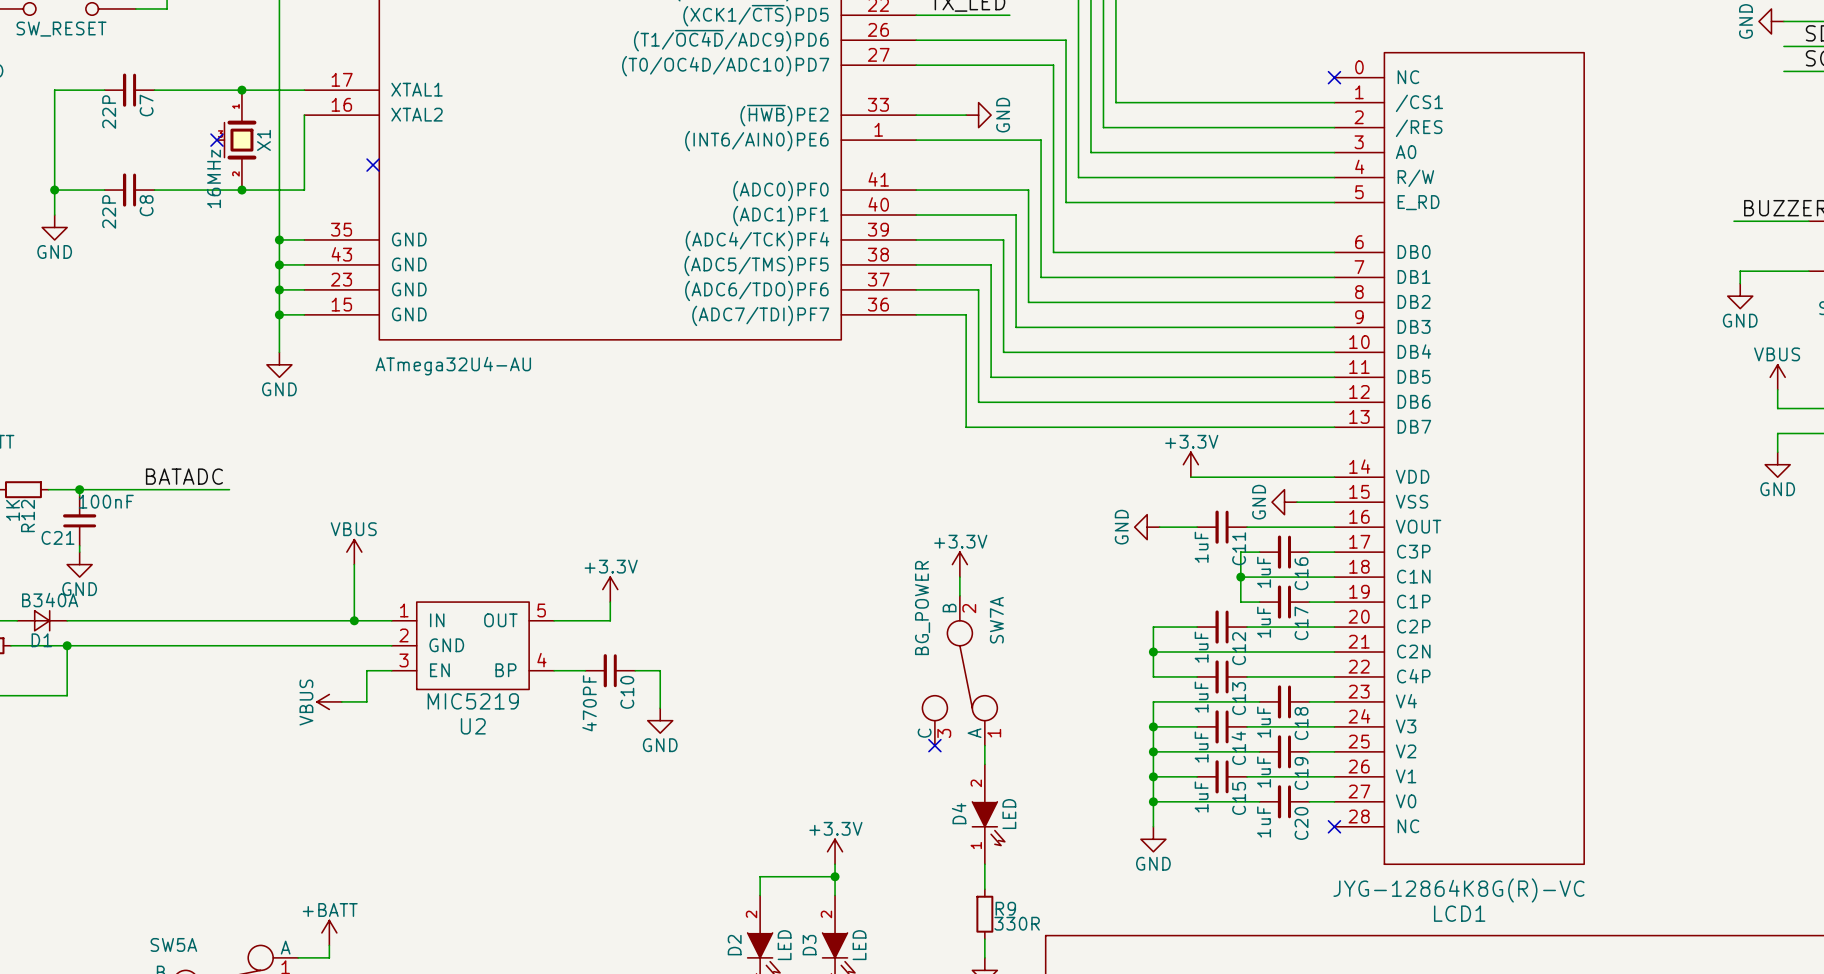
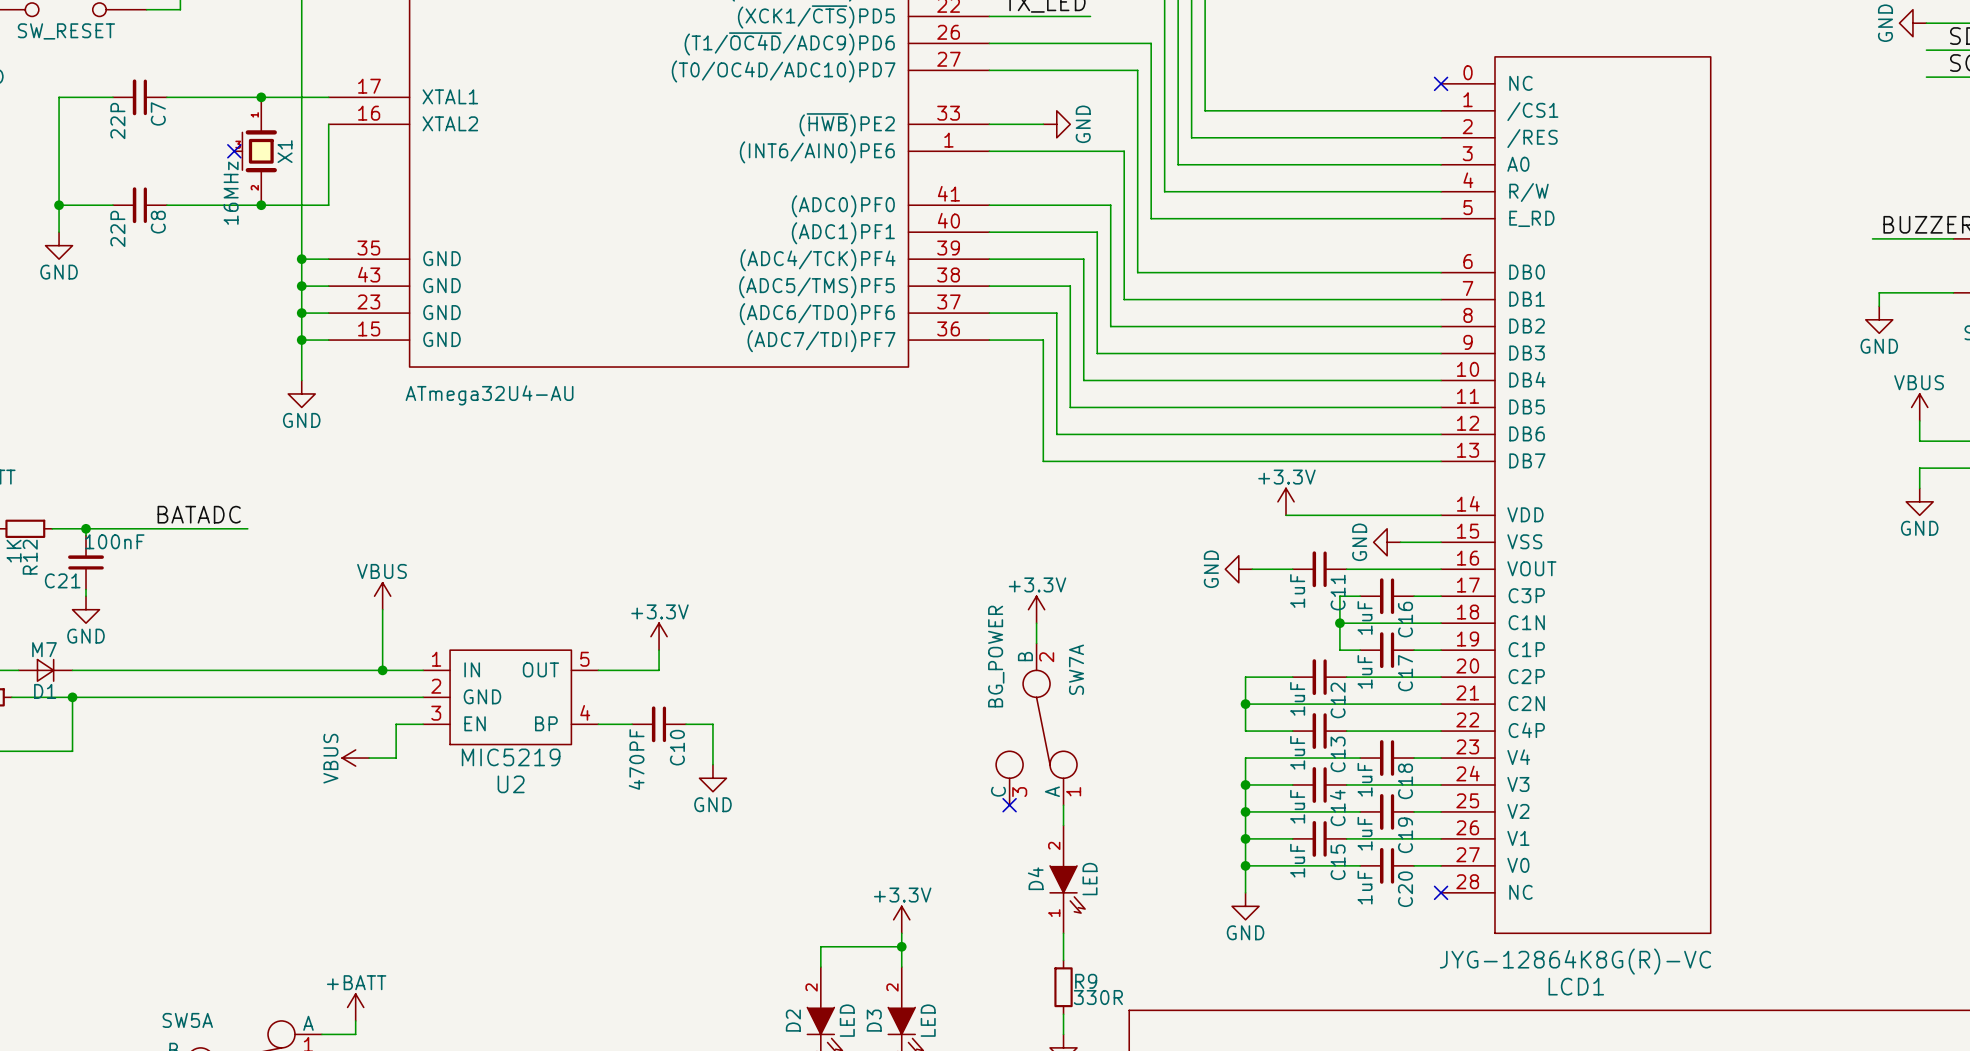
no-connect mark: (373, 165) -> none
D1 value: B340A (50, 600) -> M7 (44, 649)

